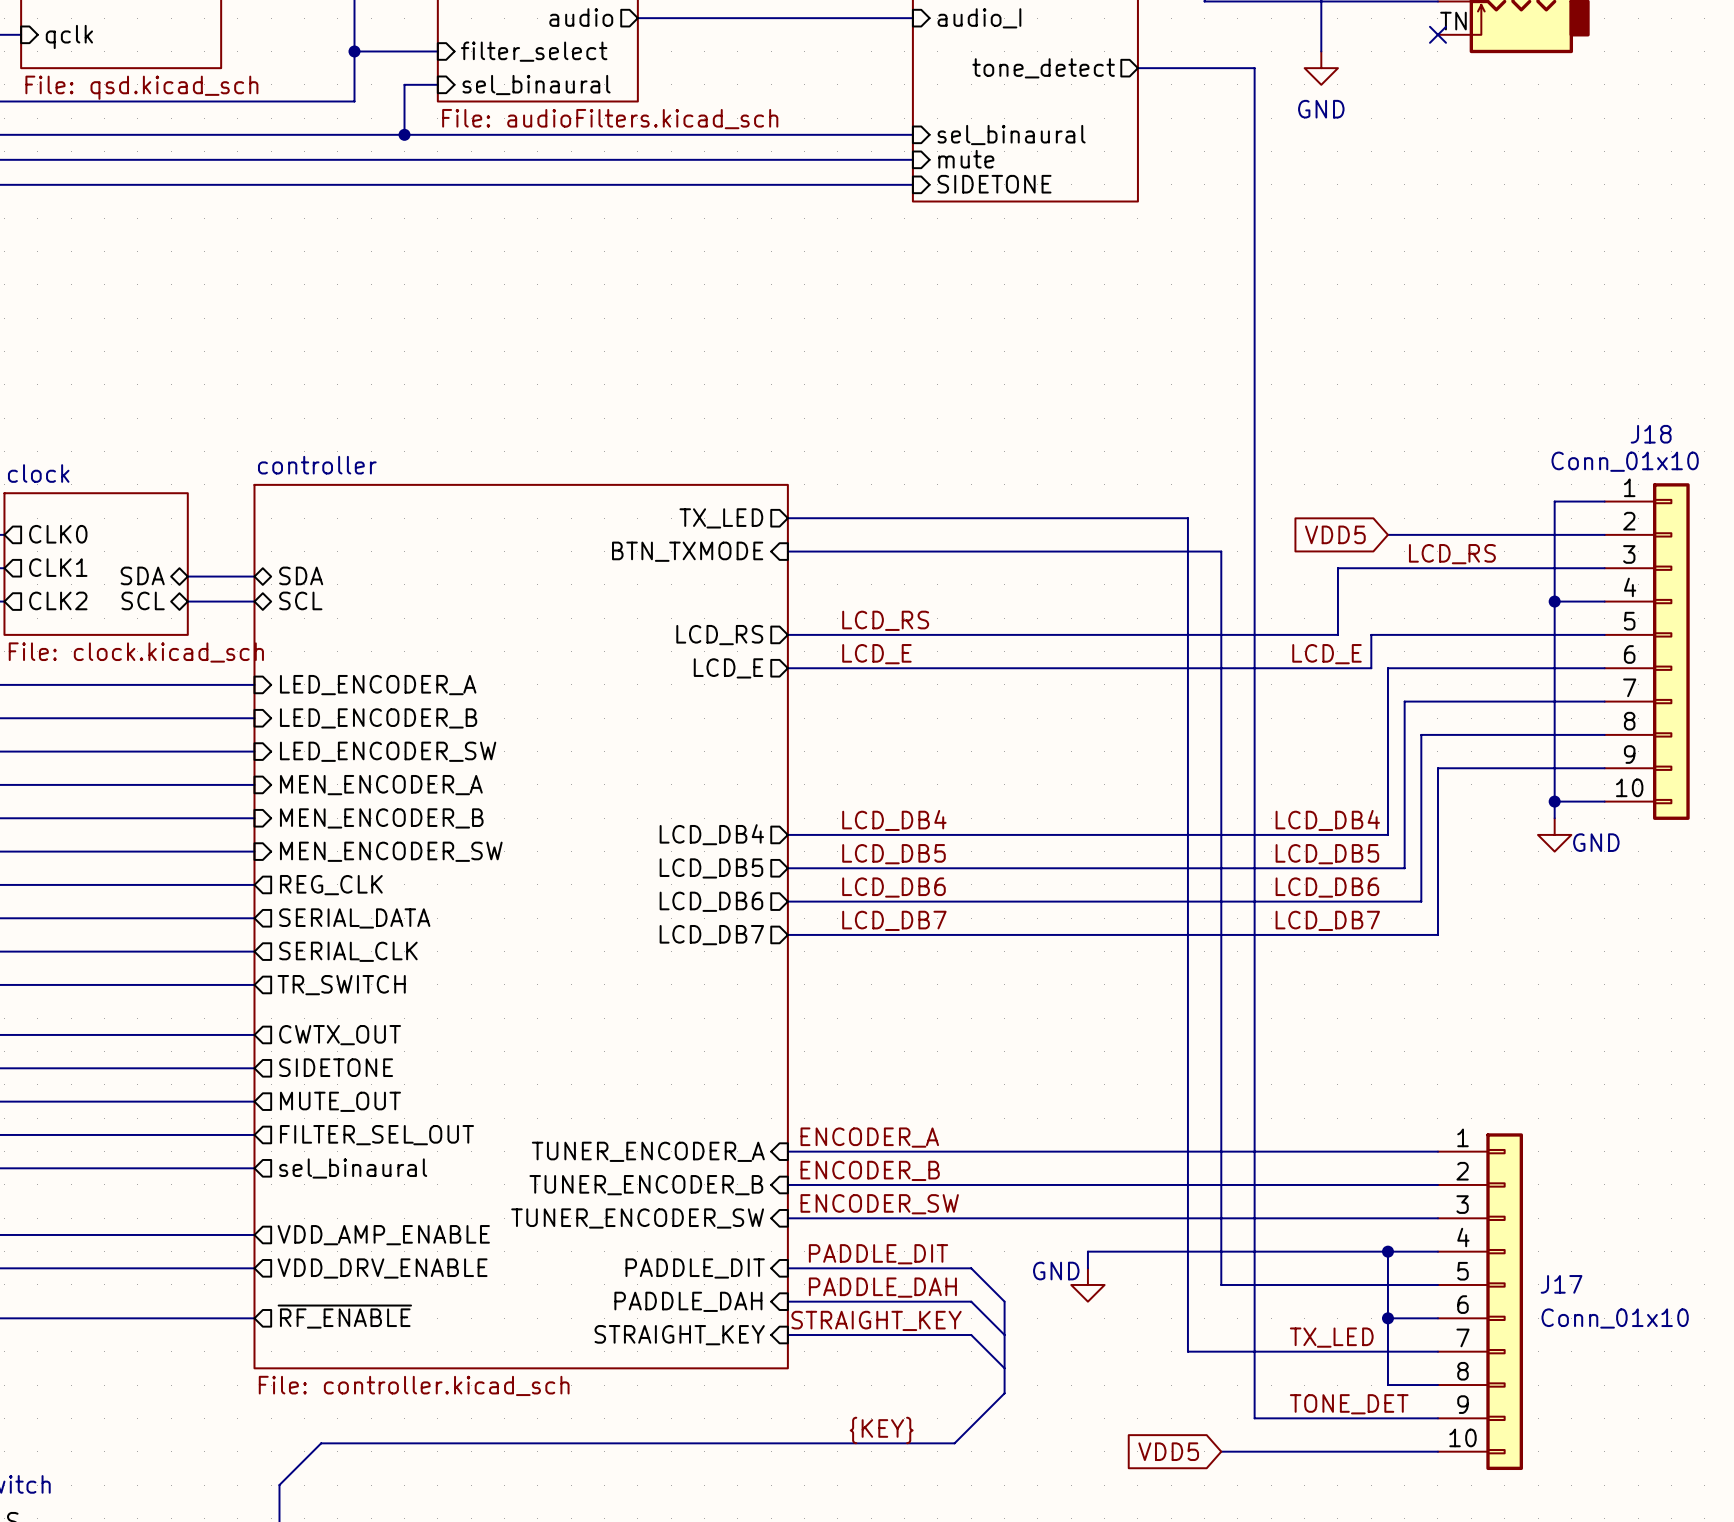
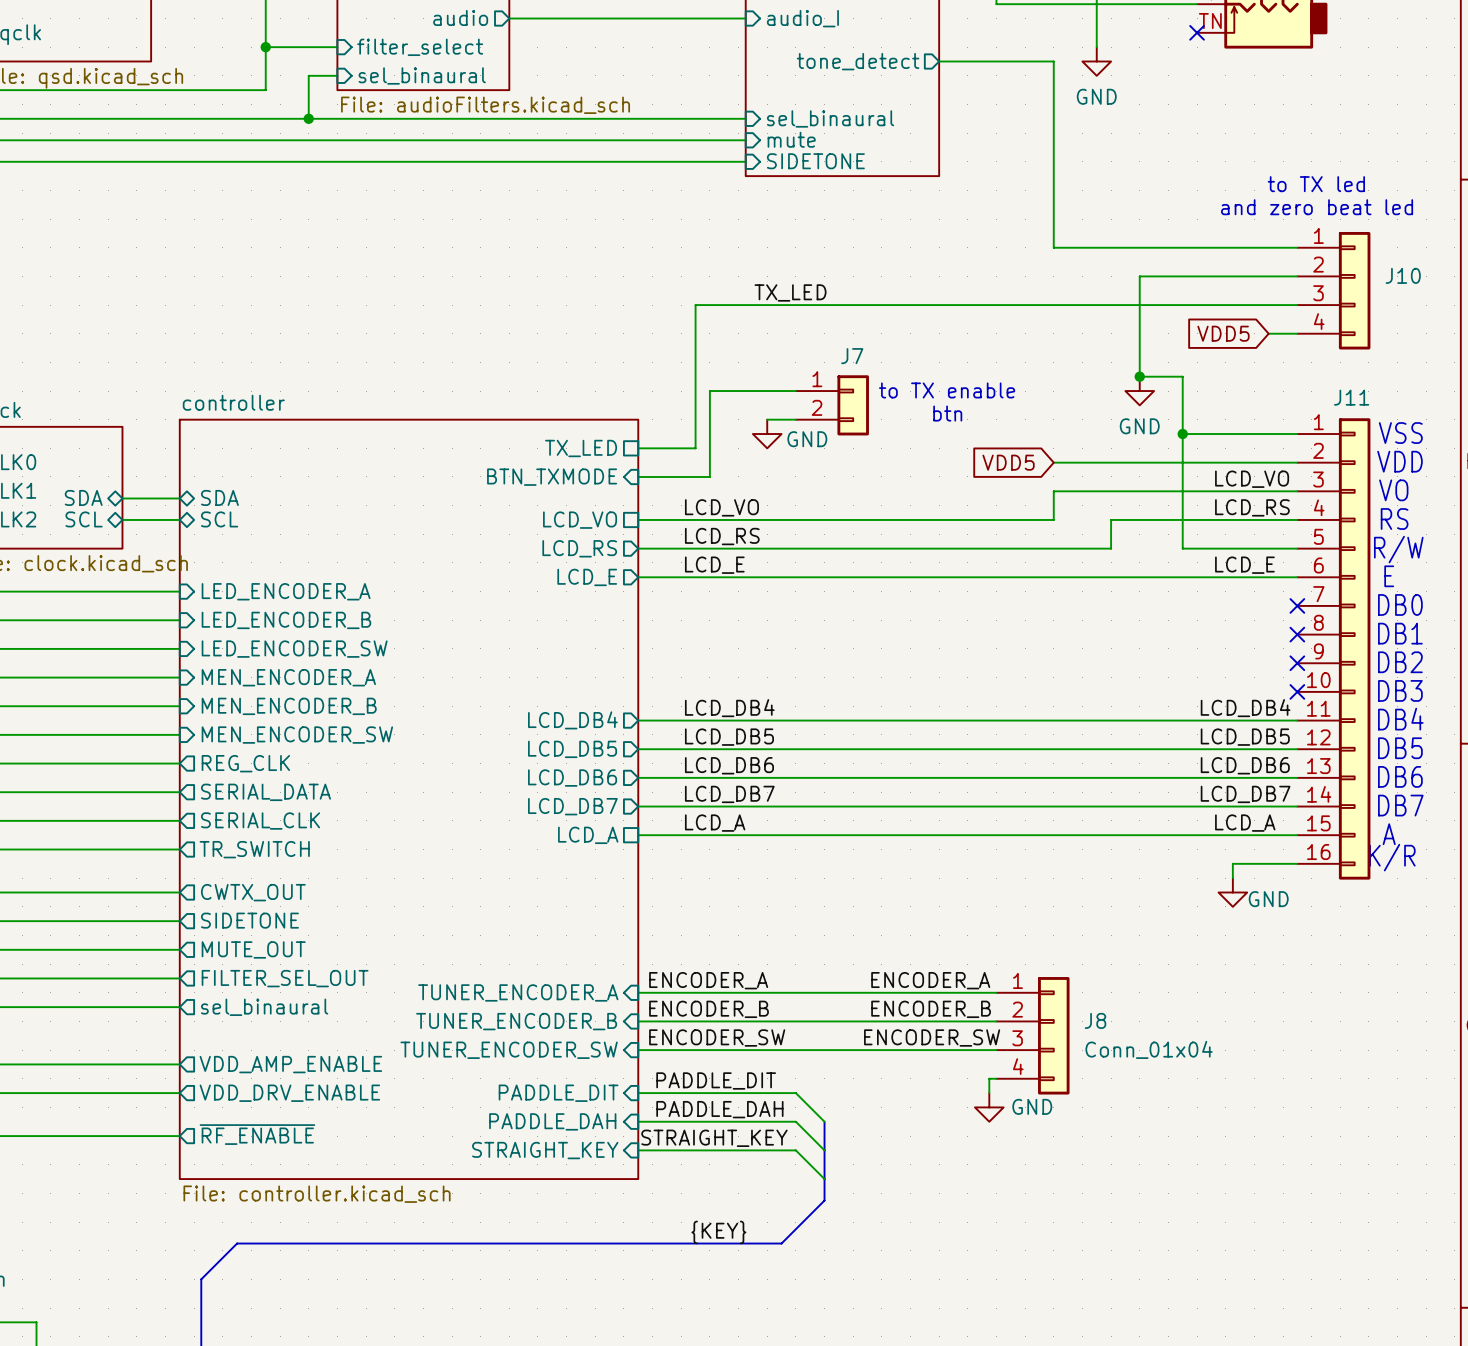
wire: (1254, 68) (1254, 1418) (1437, 1418) -> (1039, 61) (1053, 61) (1053, 247) (1297, 247)
text: none -> to TX led (1316, 184)
text: none -> and zero beat led (1317, 207)
wire: none -> (1297, 276) (1139, 276) (1139, 376) (1182, 376) (1182, 548)
J10: none -> (1333, 290)
label: none -> TX_LED (790, 292)
global label: none -> VDD5 (1223, 333)
wire: none -> (1268, 333) (1297, 333)
junction: none -> (1139, 376)
text: none -> to TX enable (947, 390)
power symbol: none -> GND (1139, 391)
J7: none -> (832, 405)
text: none -> btn (947, 413)
wire: none -> (767, 419) (795, 419)
text: none -> VSS (1400, 433)
power symbol: none -> GND (767, 434)
wire: none -> (1182, 434) (1297, 434)
junction: none -> (1182, 434)
wire: (1604, 501) (1554, 501) (1554, 818) -> none
sheet pin shape: output (721, 518) -> passive (581, 448)
wire: (854, 518) (1187, 518) (1187, 1351) (1437, 1351) -> (695, 448) (695, 305) (1297, 305)
text: none -> VDD (1399, 461)
global label: none -> VDD5 (1008, 462)
wire: none -> (1053, 462) (1154, 462)
global label: VDD5 (1335, 534) -> none
wire: (871, 551) (1221, 551) (1221, 1284) (1437, 1284) -> (709, 476) (709, 391) (795, 391)
label position: LCD_RS (1452, 554) -> LCD_RS (1252, 507)
label: none -> LCD_VO (1252, 479)
text: none -> VO (1393, 490)
wire: (1337, 568) (1337, 601) -> (1297, 519) (1111, 519)
wire: none -> (1111, 491) (1053, 491) (1053, 519) (638, 519)
label: none -> LCD_VO (721, 507)
text: none -> RS (1394, 519)
sheet pin: none -> LCD_VO (580, 520)
junction: (1554, 601) -> none
wire: (1421, 634) (1371, 634) (1371, 668) -> (1154, 577) (1139, 577)
text: none -> R/W (1398, 549)
J18: Conn_01x10 (1647, 651) -> none
label position: LCD_E (1326, 654) -> LCD_E (1244, 565)
text: none -> E (1389, 576)
wire: (1387, 668) (1387, 834) -> (1297, 720) (1154, 720)
text: none -> DB0 (1400, 604)
no-connect mark: none -> (1297, 605)
wire: (1604, 701) (1404, 701) (1404, 868) -> (1297, 749) (1168, 749)
text: none -> DB1 (1400, 633)
no-connect mark: none -> (1297, 634)
wire: (1604, 734) (1421, 734) (1421, 901) -> (1297, 777) (1182, 777)
J11: none -> (1333, 648)
text: none -> DB2 (1400, 662)
no-connect mark: none -> (1297, 663)
wire: (1604, 768) (1437, 768) (1437, 934) -> (1297, 806) (1197, 806)
text: none -> DB3 (1400, 690)
junction: (1554, 801) -> none
no-connect mark: none -> (1297, 691)
label position: LCD_DB4 (1327, 820) -> LCD_DB4 (1245, 708)
text: none -> DB4 (1400, 719)
power symbol: GND (1554, 834) -> none
label position: LCD_DB5 (1327, 854) -> LCD_DB5 (1245, 737)
text: none -> DB5 (1400, 748)
label position: LCD_DB6 (1327, 887) -> LCD_DB6 (1245, 765)
text: none -> DB6 (1400, 776)
label position: LCD_DB7 (1327, 920) -> LCD_DB7 (1245, 794)
text: none -> DB7 (1400, 805)
label: none -> LCD_A (715, 823)
label: none -> LCD_A (1245, 823)
text: none -> A (1389, 834)
sheet pin: none -> LCD_A (588, 835)
wire: none -> (638, 835) (1297, 835)
text: none -> K/R (1392, 857)
wire: none -> (1297, 863) (1232, 863) (1232, 878)
power symbol: none -> GND (1232, 892)
label: none -> ENCODER_A (930, 980)
wire: (1204, 1151) (1437, 1151) -> none
label: none -> ENCODER_B (931, 1009)
wire: (1204, 1184) (1437, 1184) -> none
J8: none -> Conn_01x04 (1033, 1035)
label: none -> ENCODER_SW (932, 1038)
wire: (1204, 1218) (1437, 1218) -> none
wire: (1196, 1251) (1087, 1251) (1087, 1268) -> (989, 1078) (989, 1093)
wire: (1204, 1251) (1437, 1251) -> none
wire: (1387, 1251) (1387, 1385) (1437, 1385) -> none
junction: (1387, 1251) -> none
power symbol text position: GND (1056, 1271) -> GND (1032, 1106)
power symbol position: GND (1087, 1284) -> GND (989, 1107)
J17: Conn_01x10 (1480, 1301) -> none
wire: (1387, 1318) (1437, 1318) -> none
junction: (1387, 1318) -> none
label: TX_LED (1331, 1337) -> none
label: TONE_DET (1349, 1404) -> none
global label: VDD5 (1168, 1451) -> none
wire: (1221, 1451) (1437, 1451) -> none

